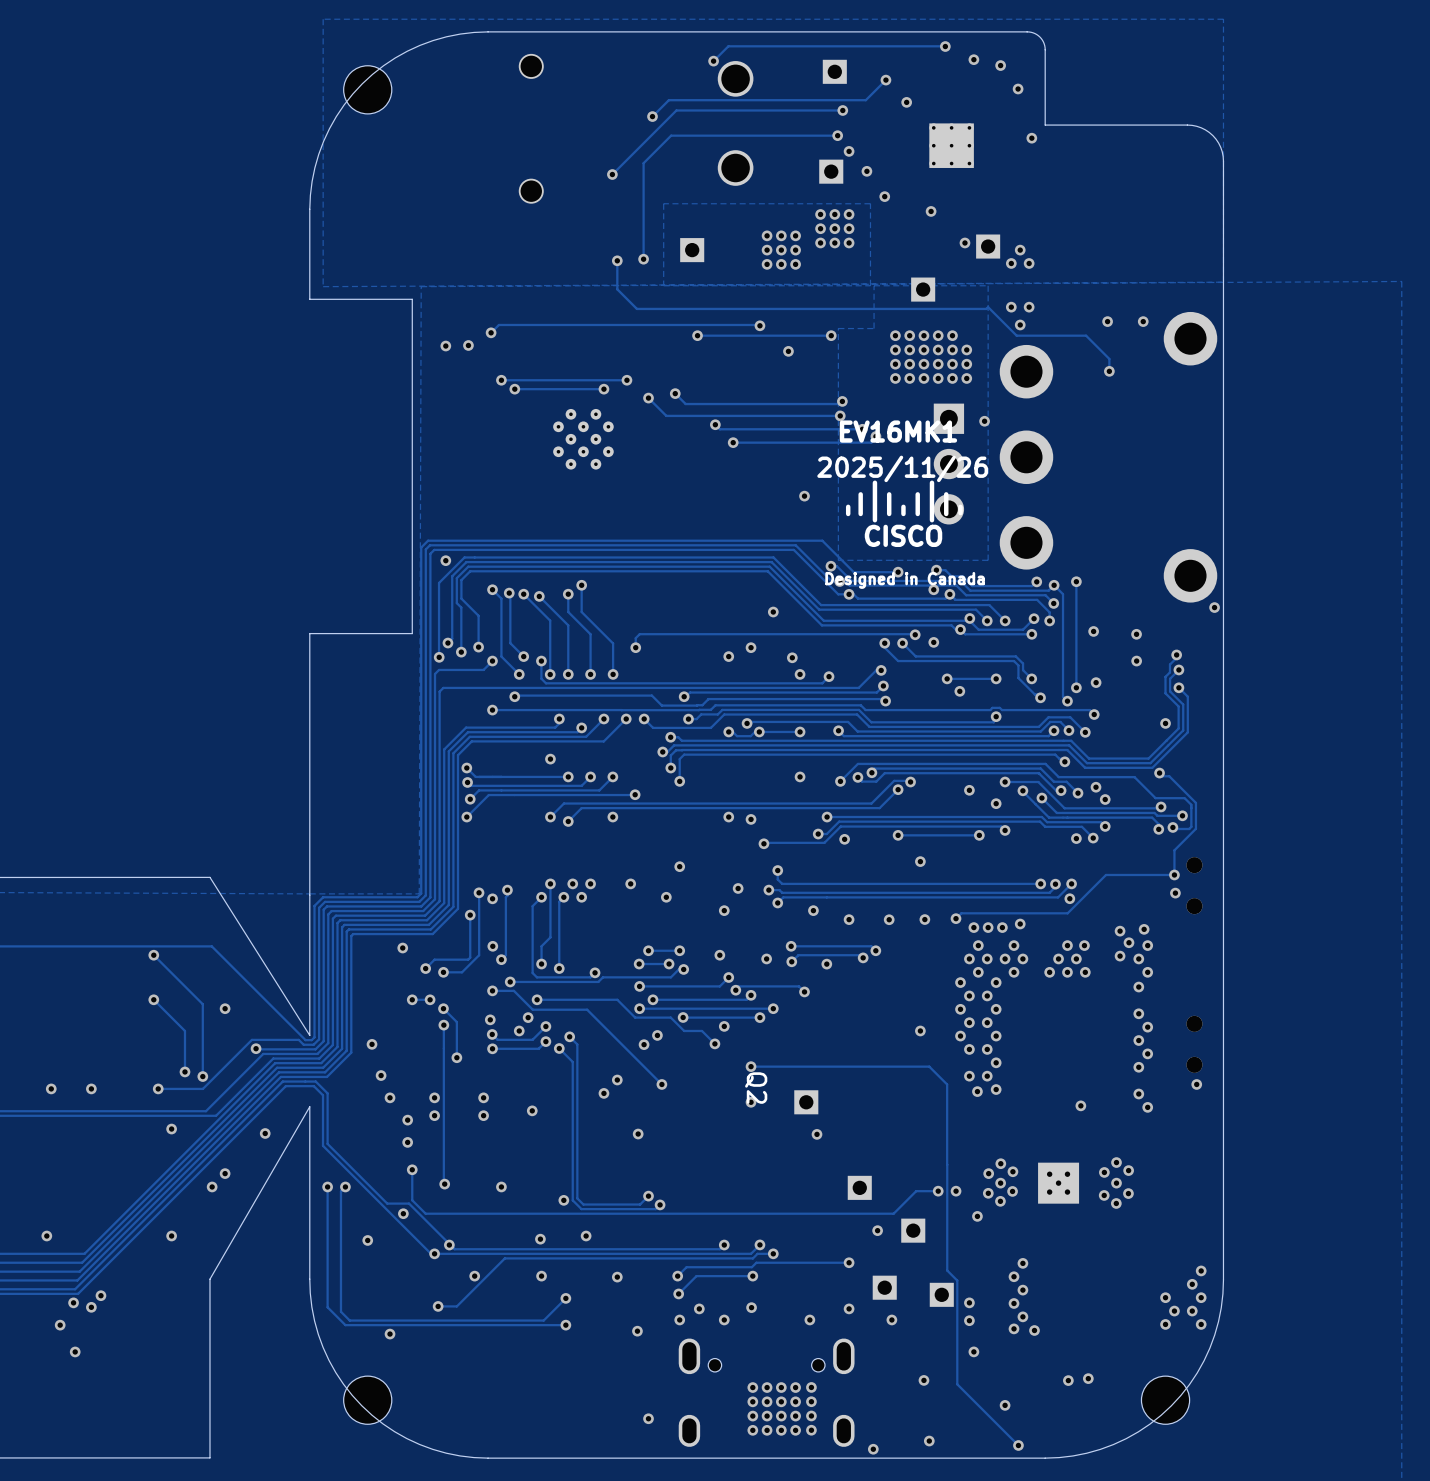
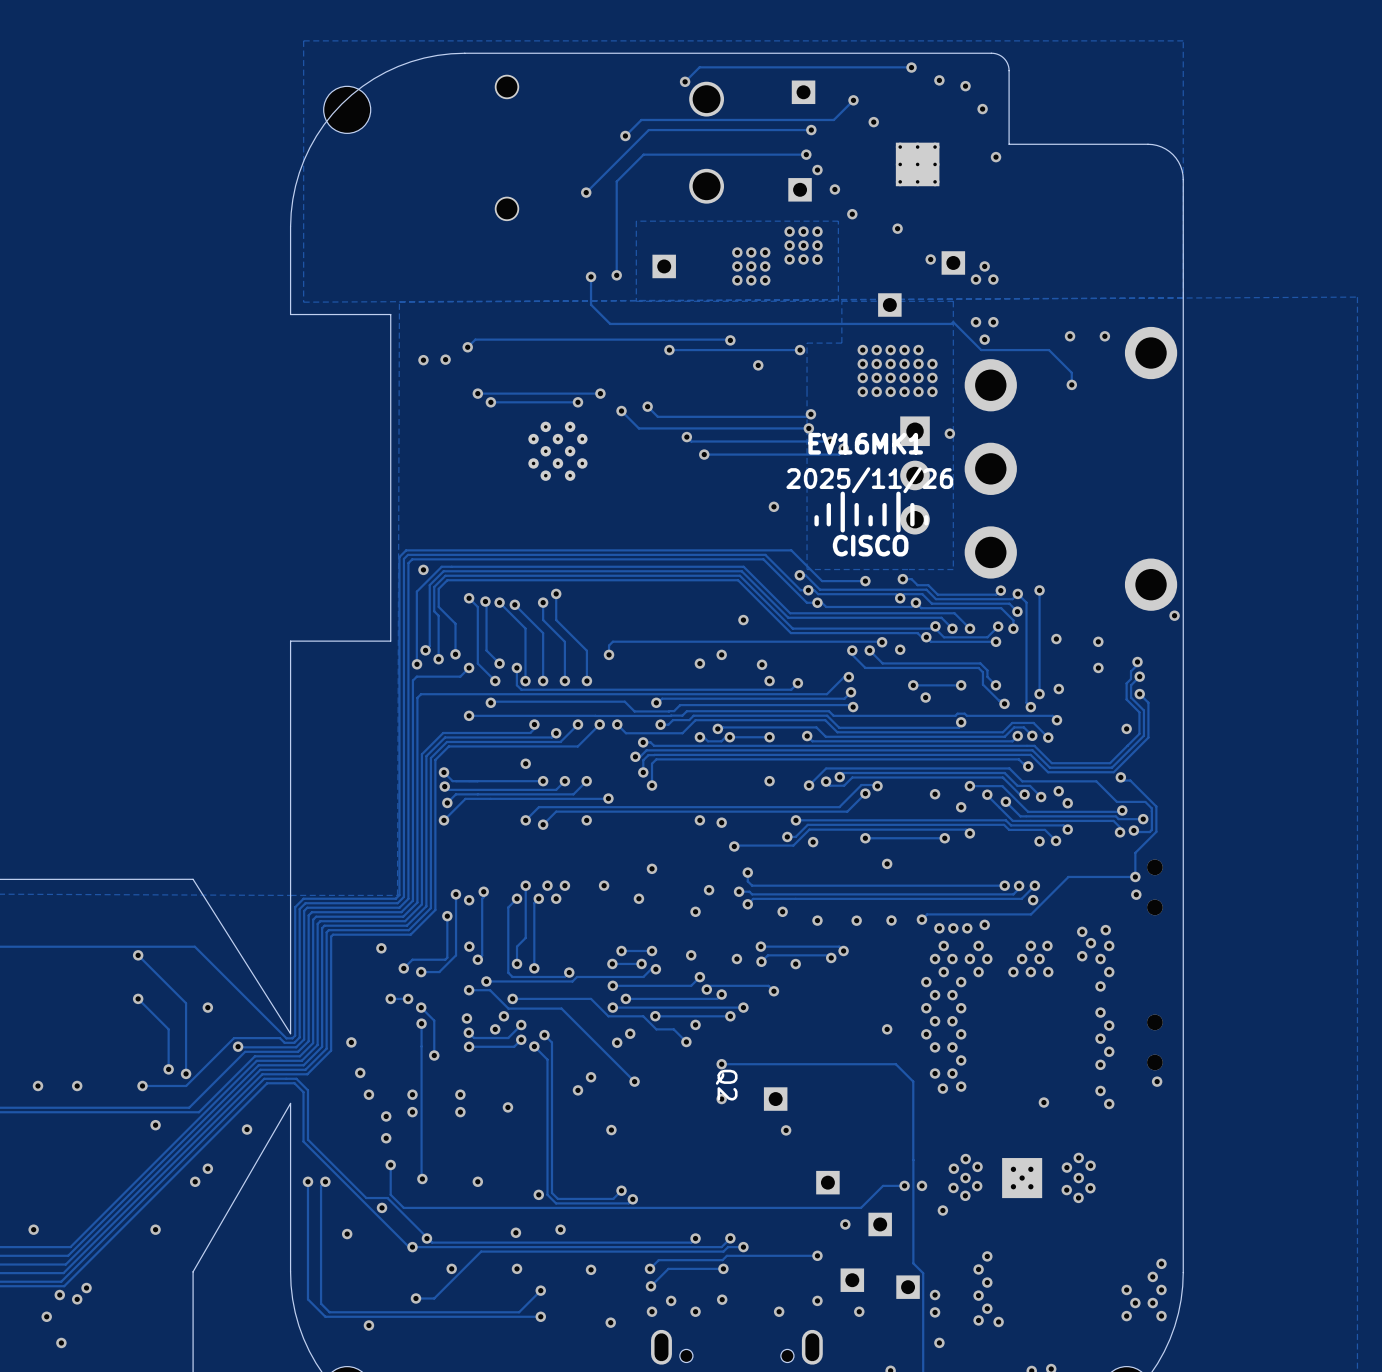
text: Designed in Canada (905, 580) -> none

